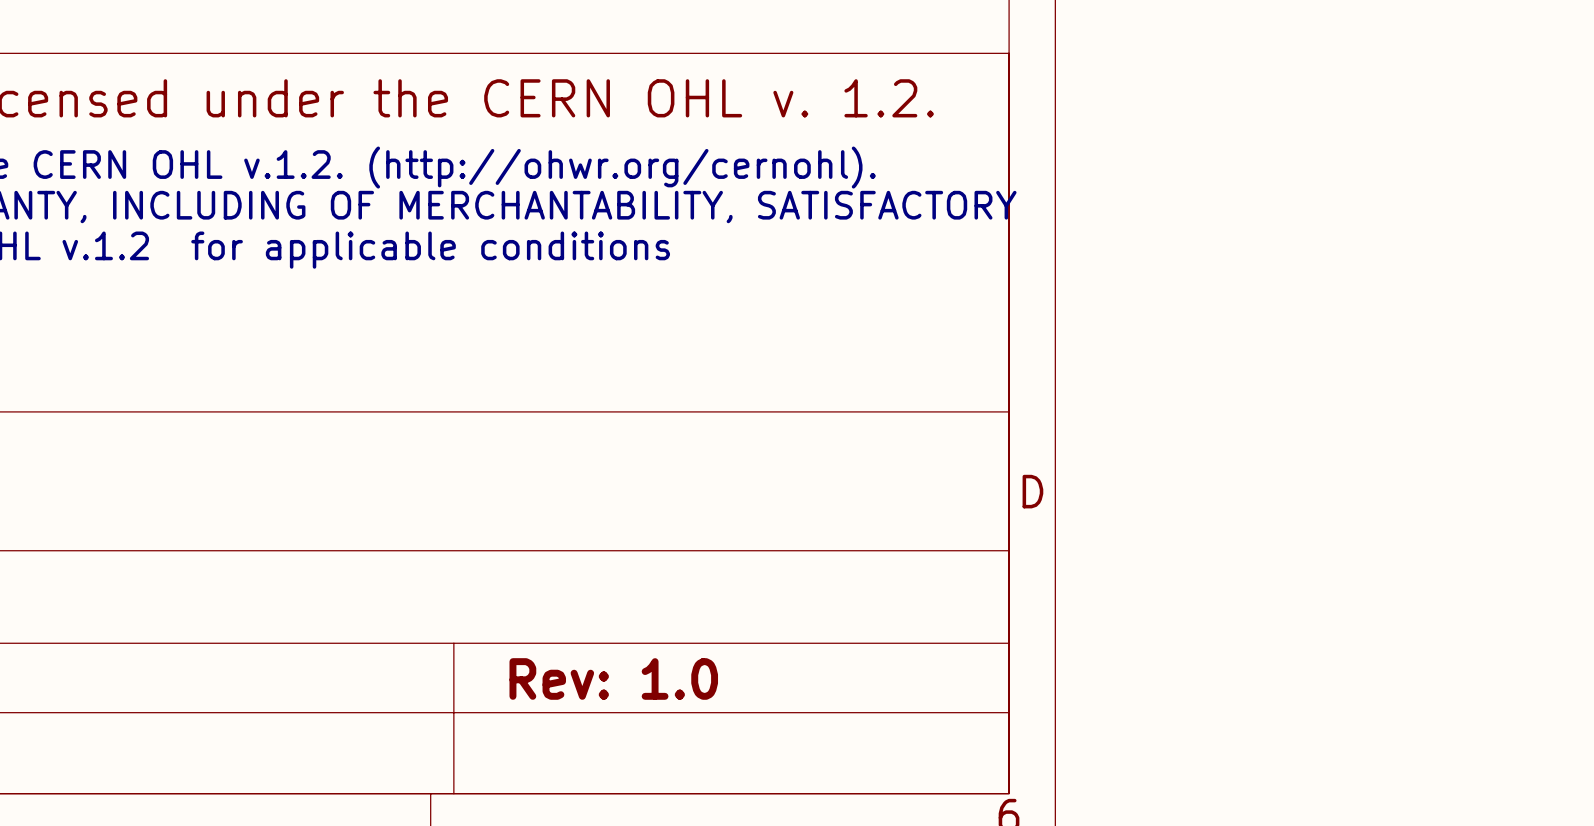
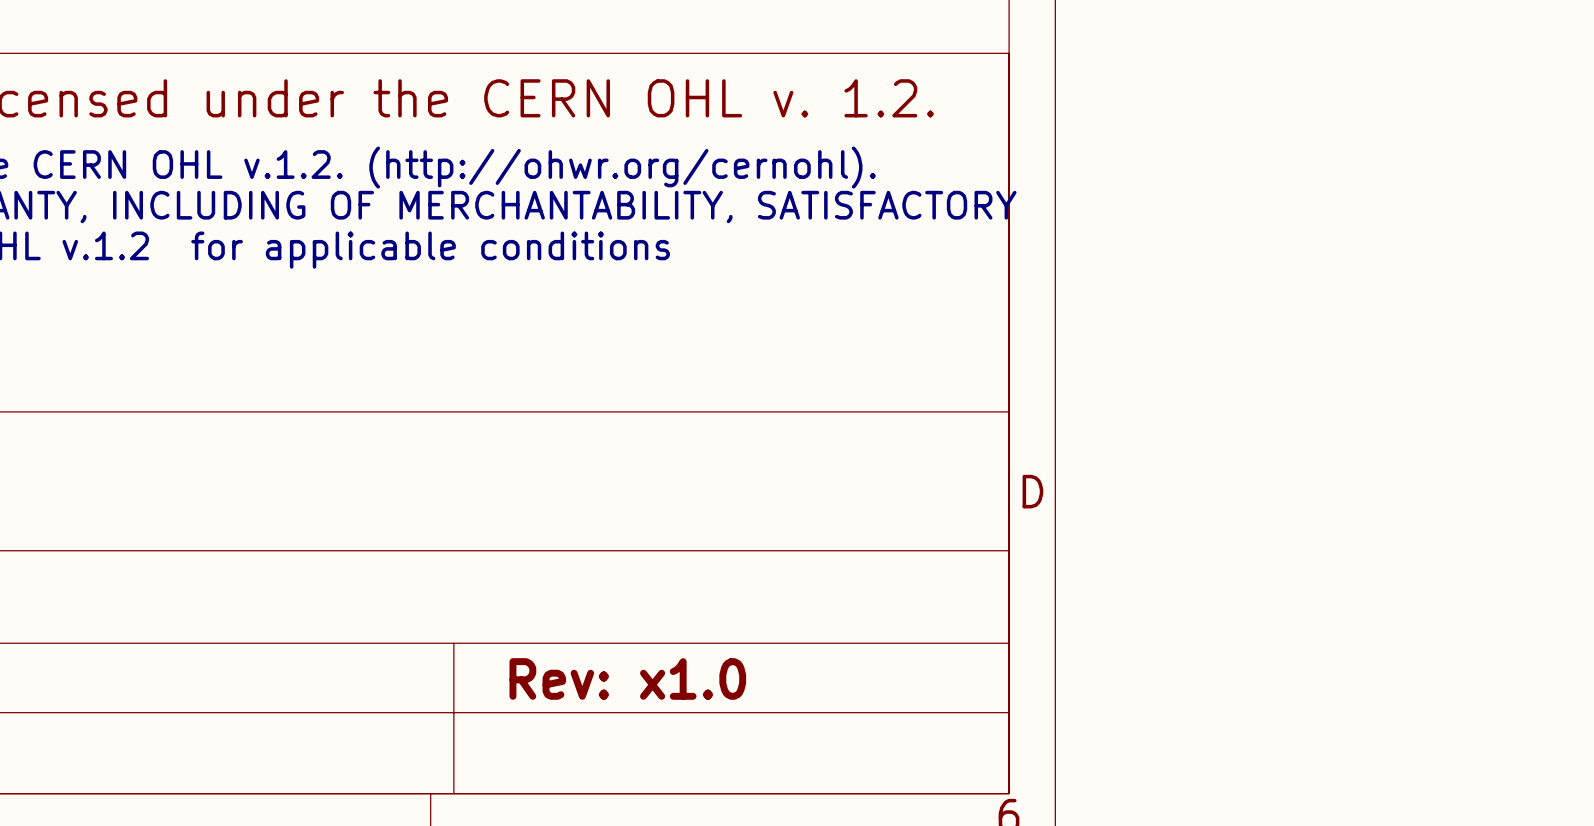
title block: Rev: 1.0 (613, 678) -> Rev: x1.0 (627, 678)

